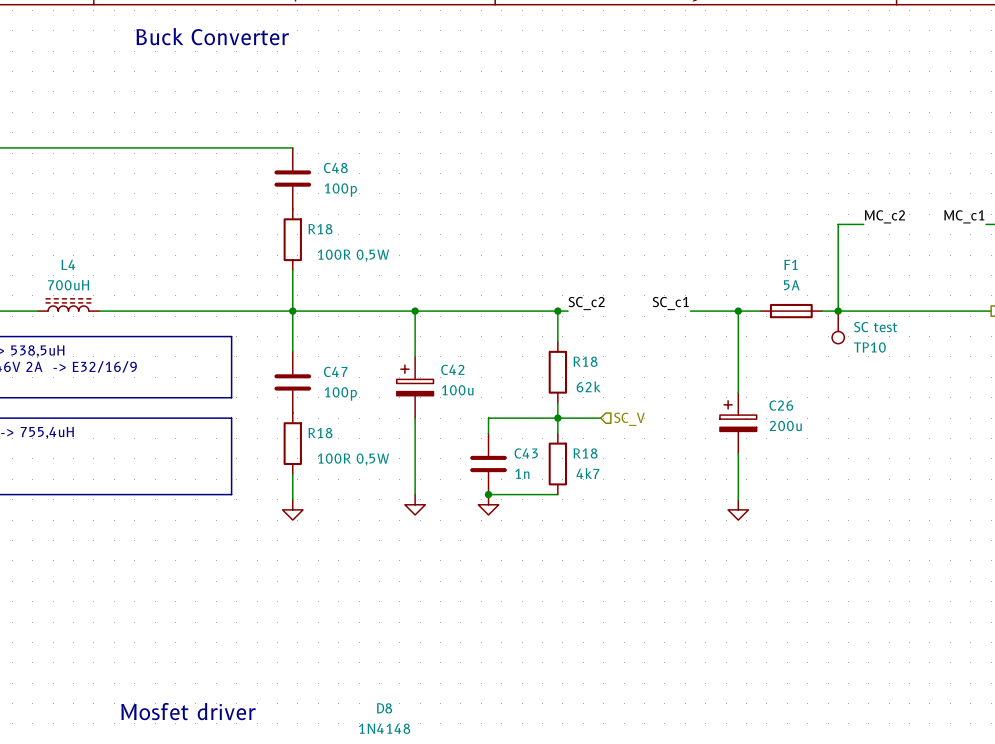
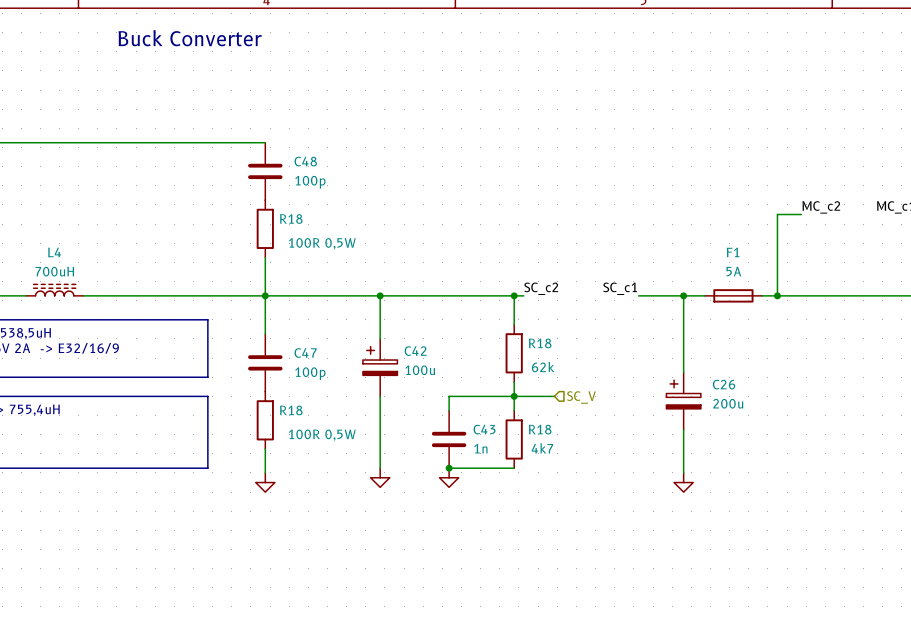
TP10: SC test (838, 327) -> none

